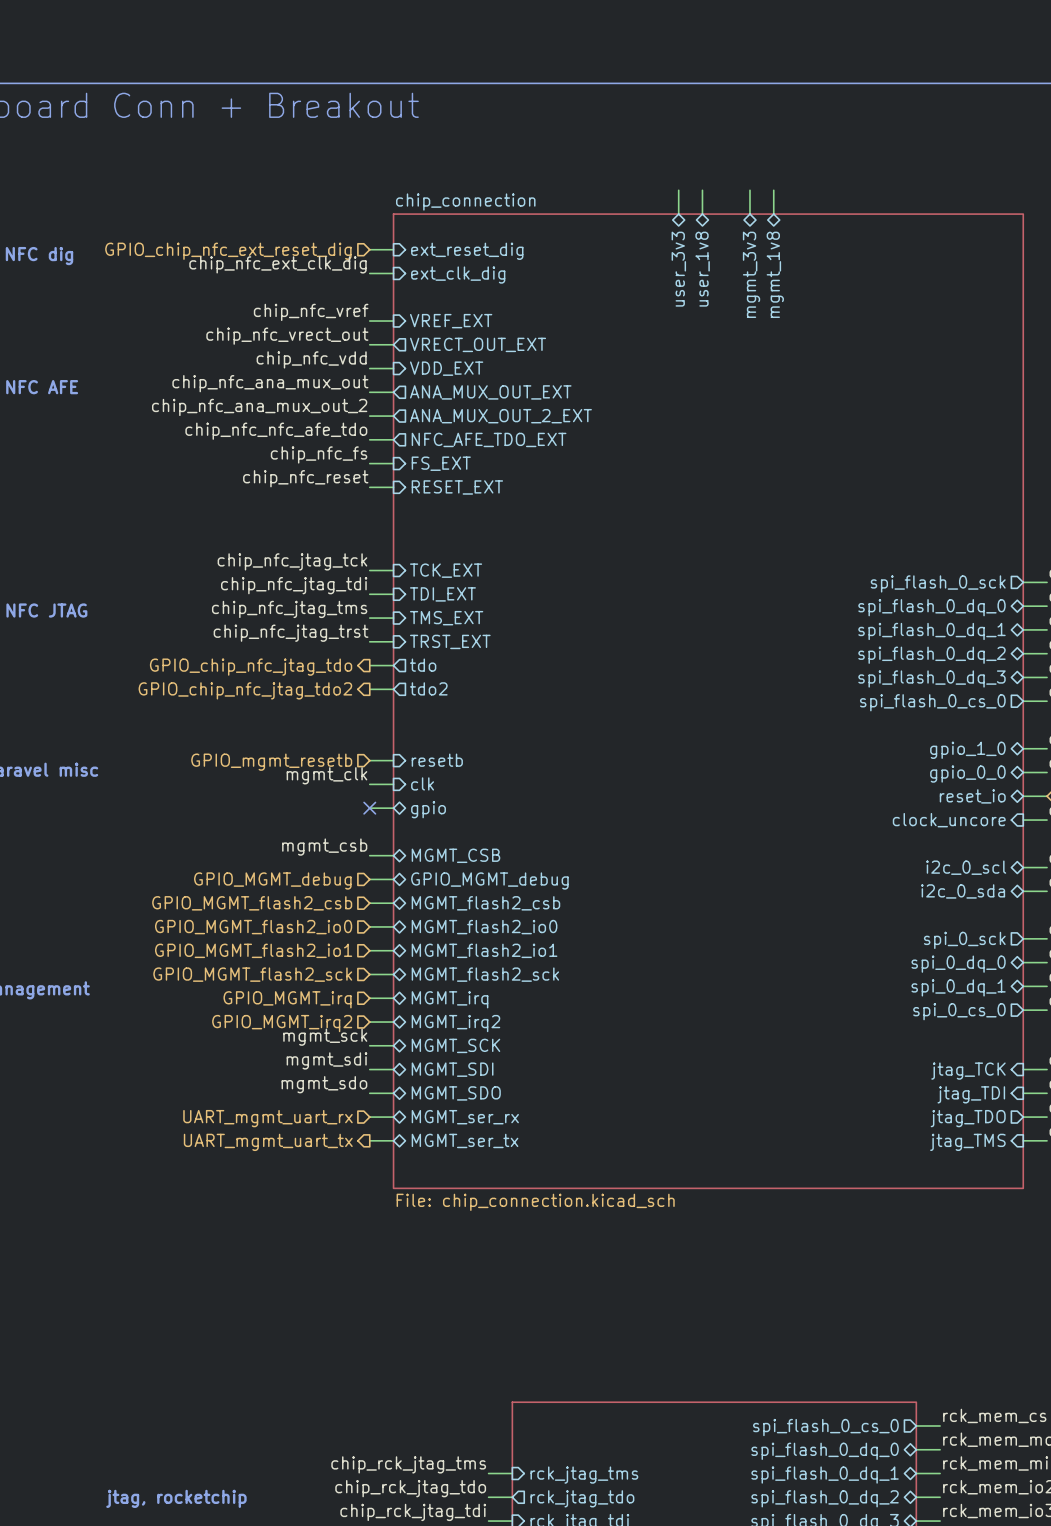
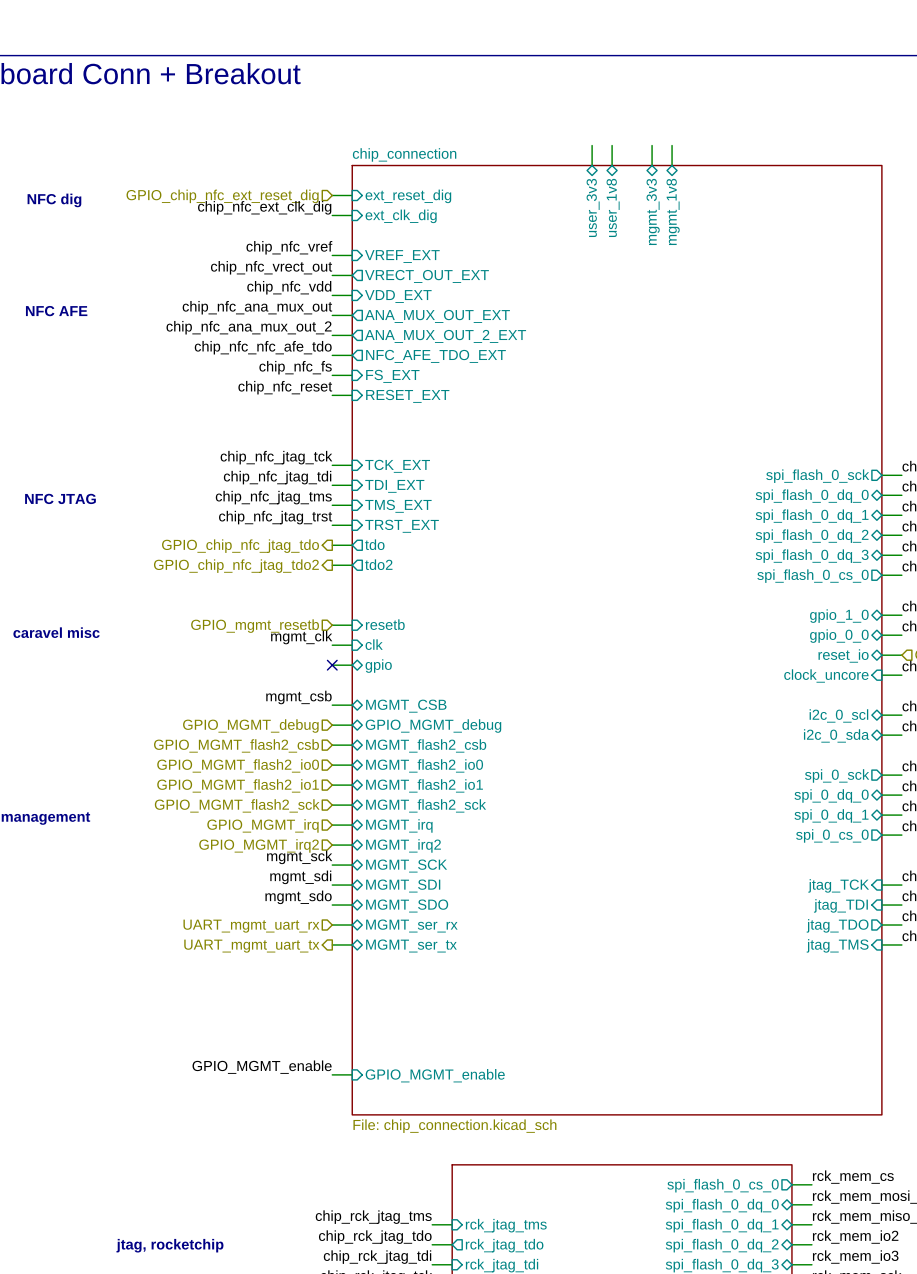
sheet chip_connection: File: chip_connection.kicad_sch (708, 701) -> none
sheet chip_connection: none -> File: chip_connection.kicad_sch (617, 640)
label: none -> GPIO_MGMT_enable (262, 1067)
wire: none -> (332, 1074) (352, 1074)
sheet pin: none -> GPIO_MGMT_enable (435, 1075)

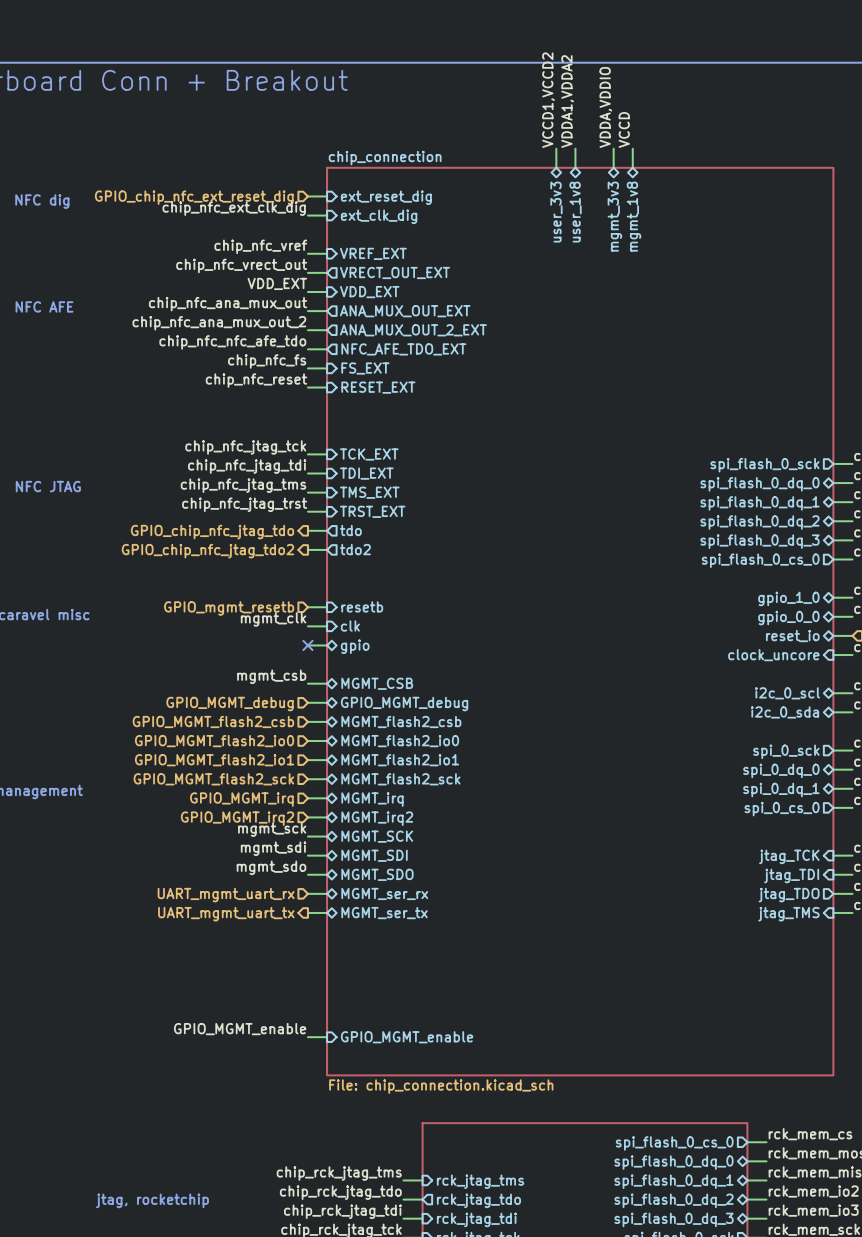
label: none -> VCCD1,VCCD2 (548, 100)
label: none -> VDDA1,VDDA2 (567, 101)
label: none -> VDDA,VDDIO (605, 107)
label: none -> VCCD (624, 129)
label: chip_nfc_vdd (289, 287) -> VDD_EXT (277, 283)

